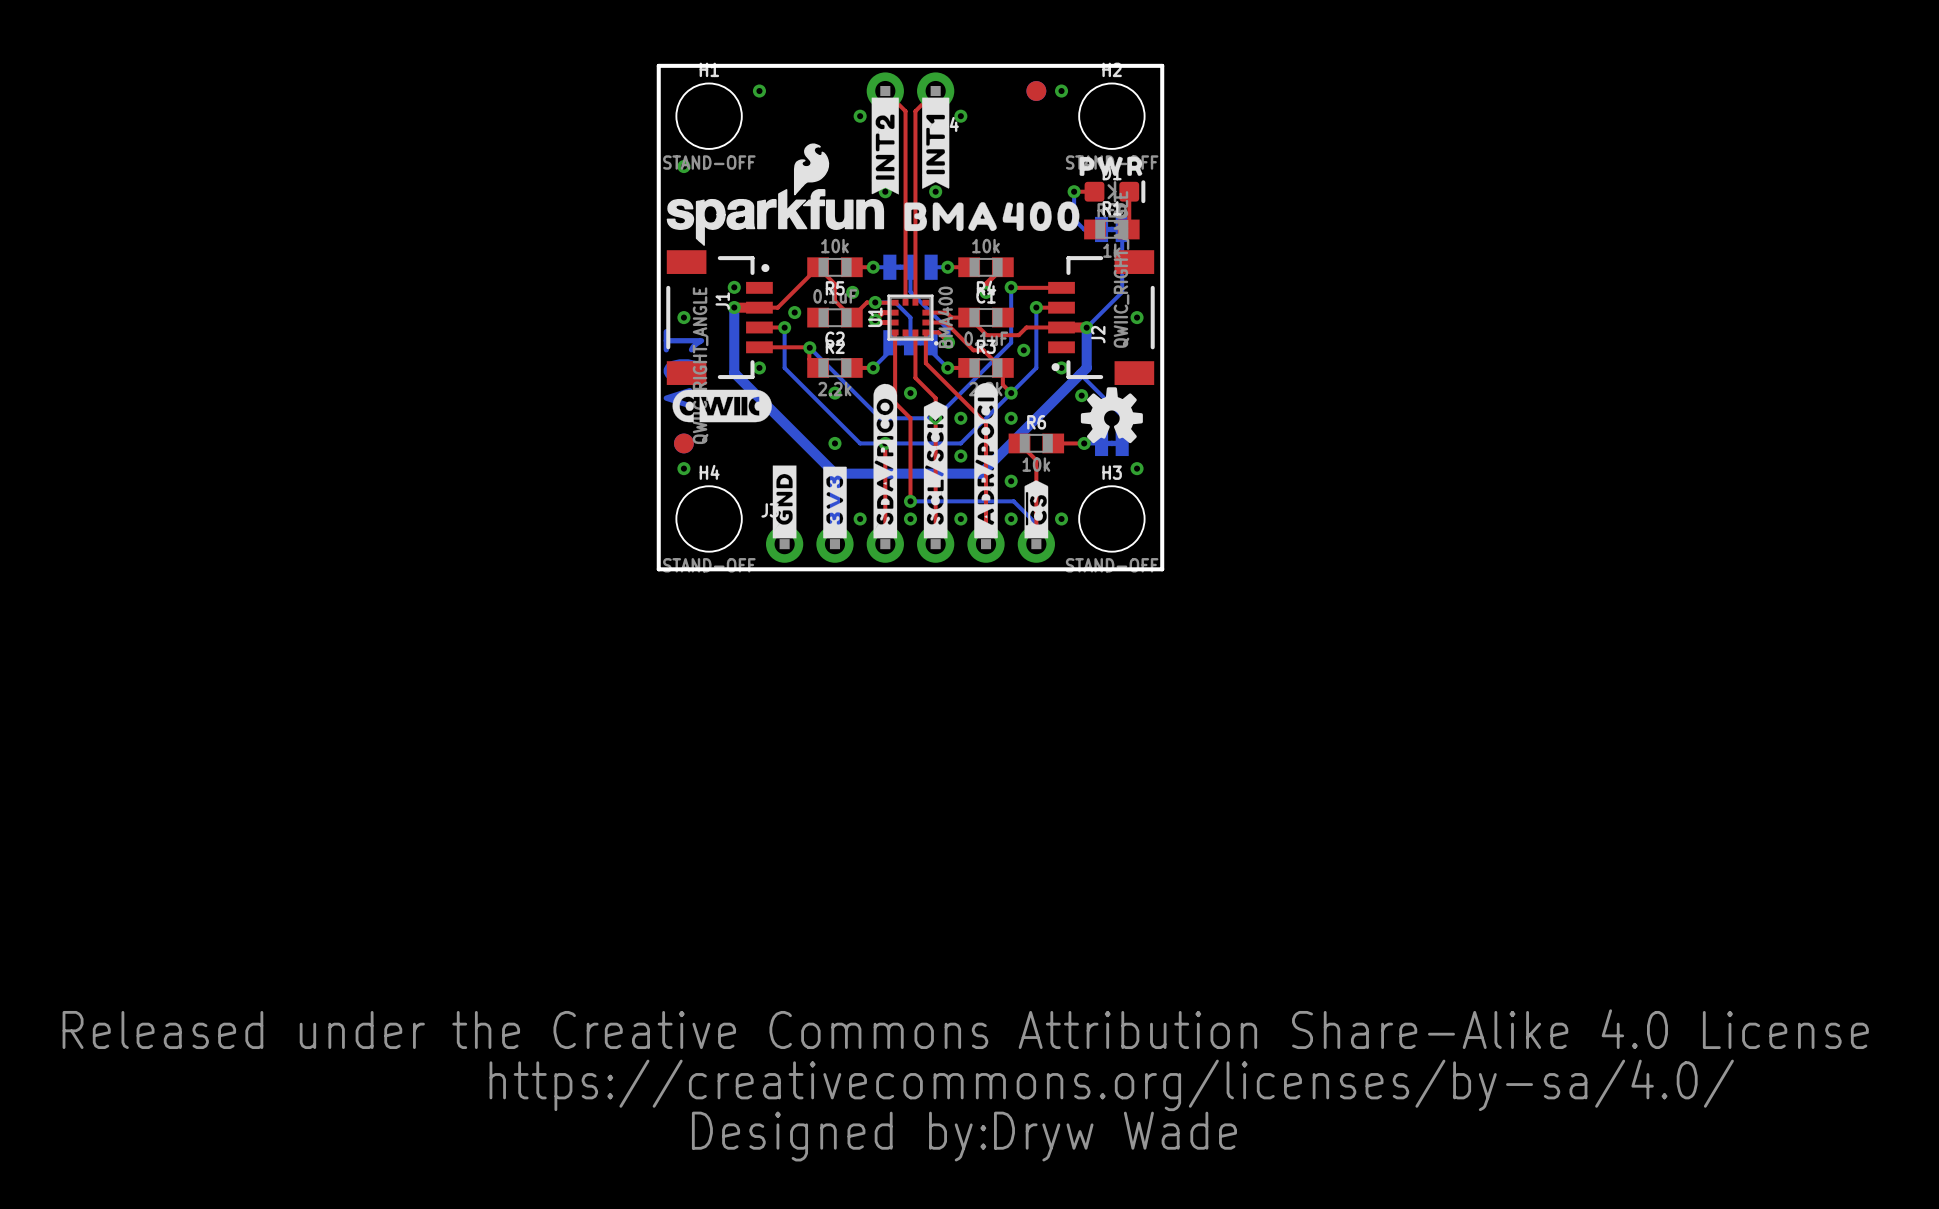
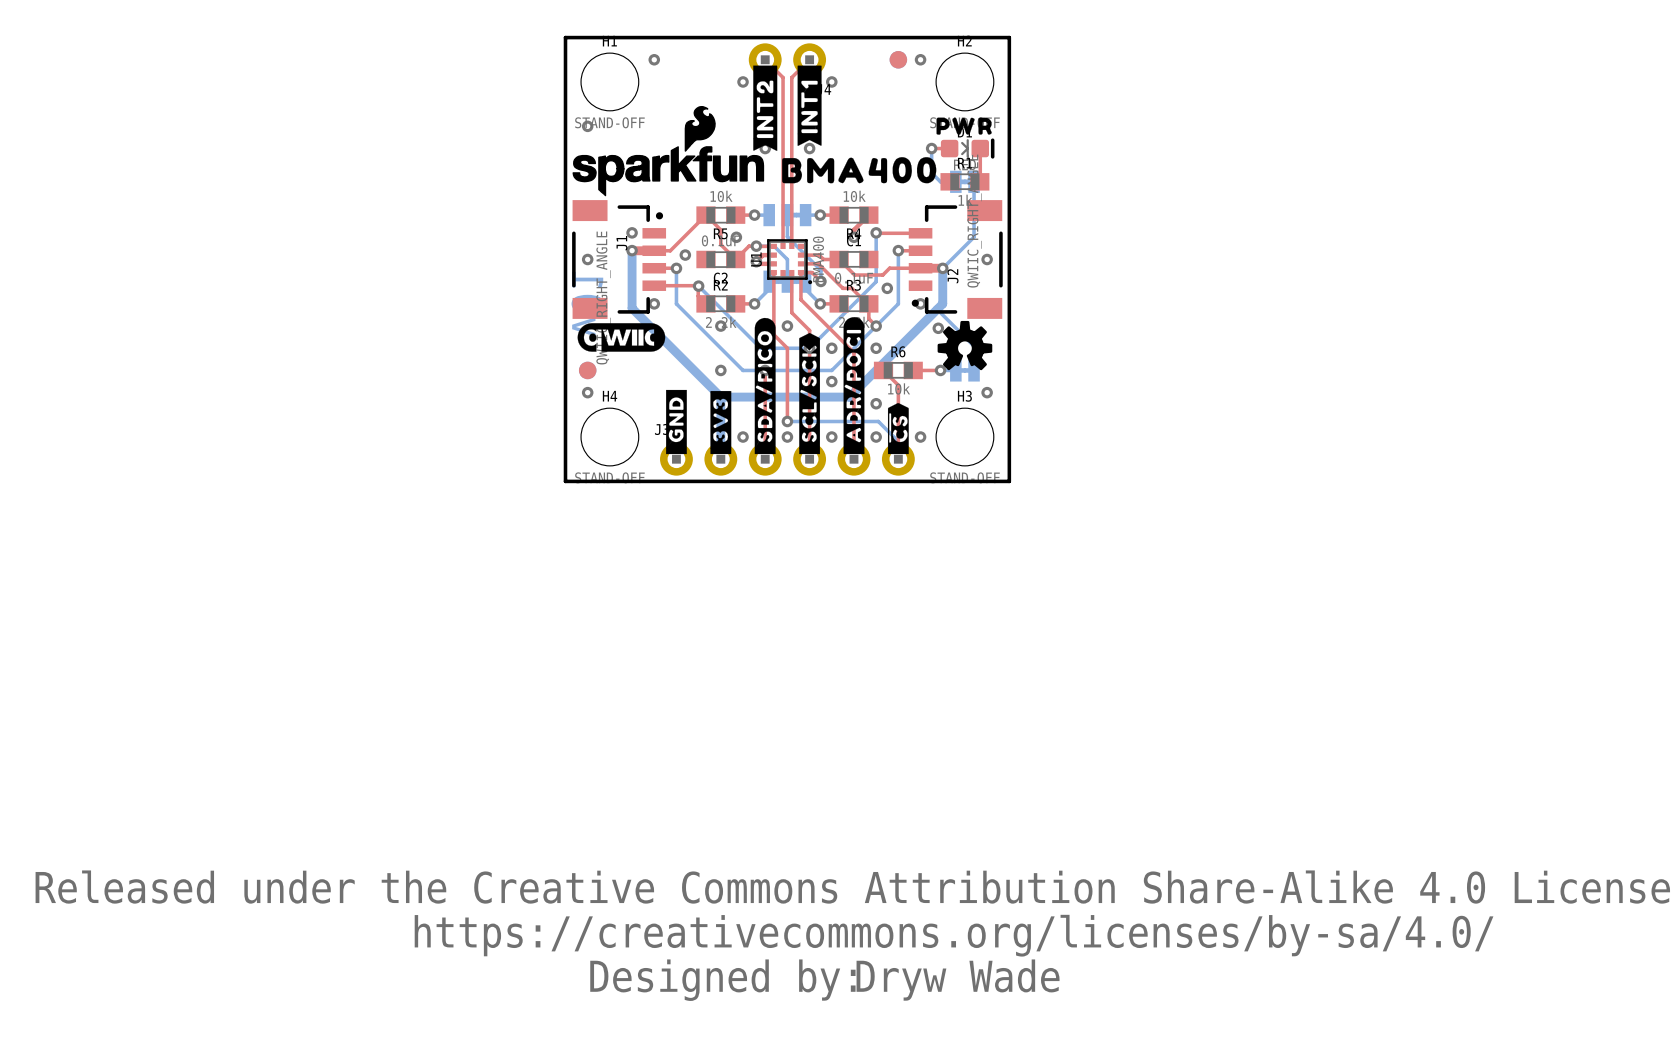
part rotation: 0° (910, 267) -> 180° (787, 215)

